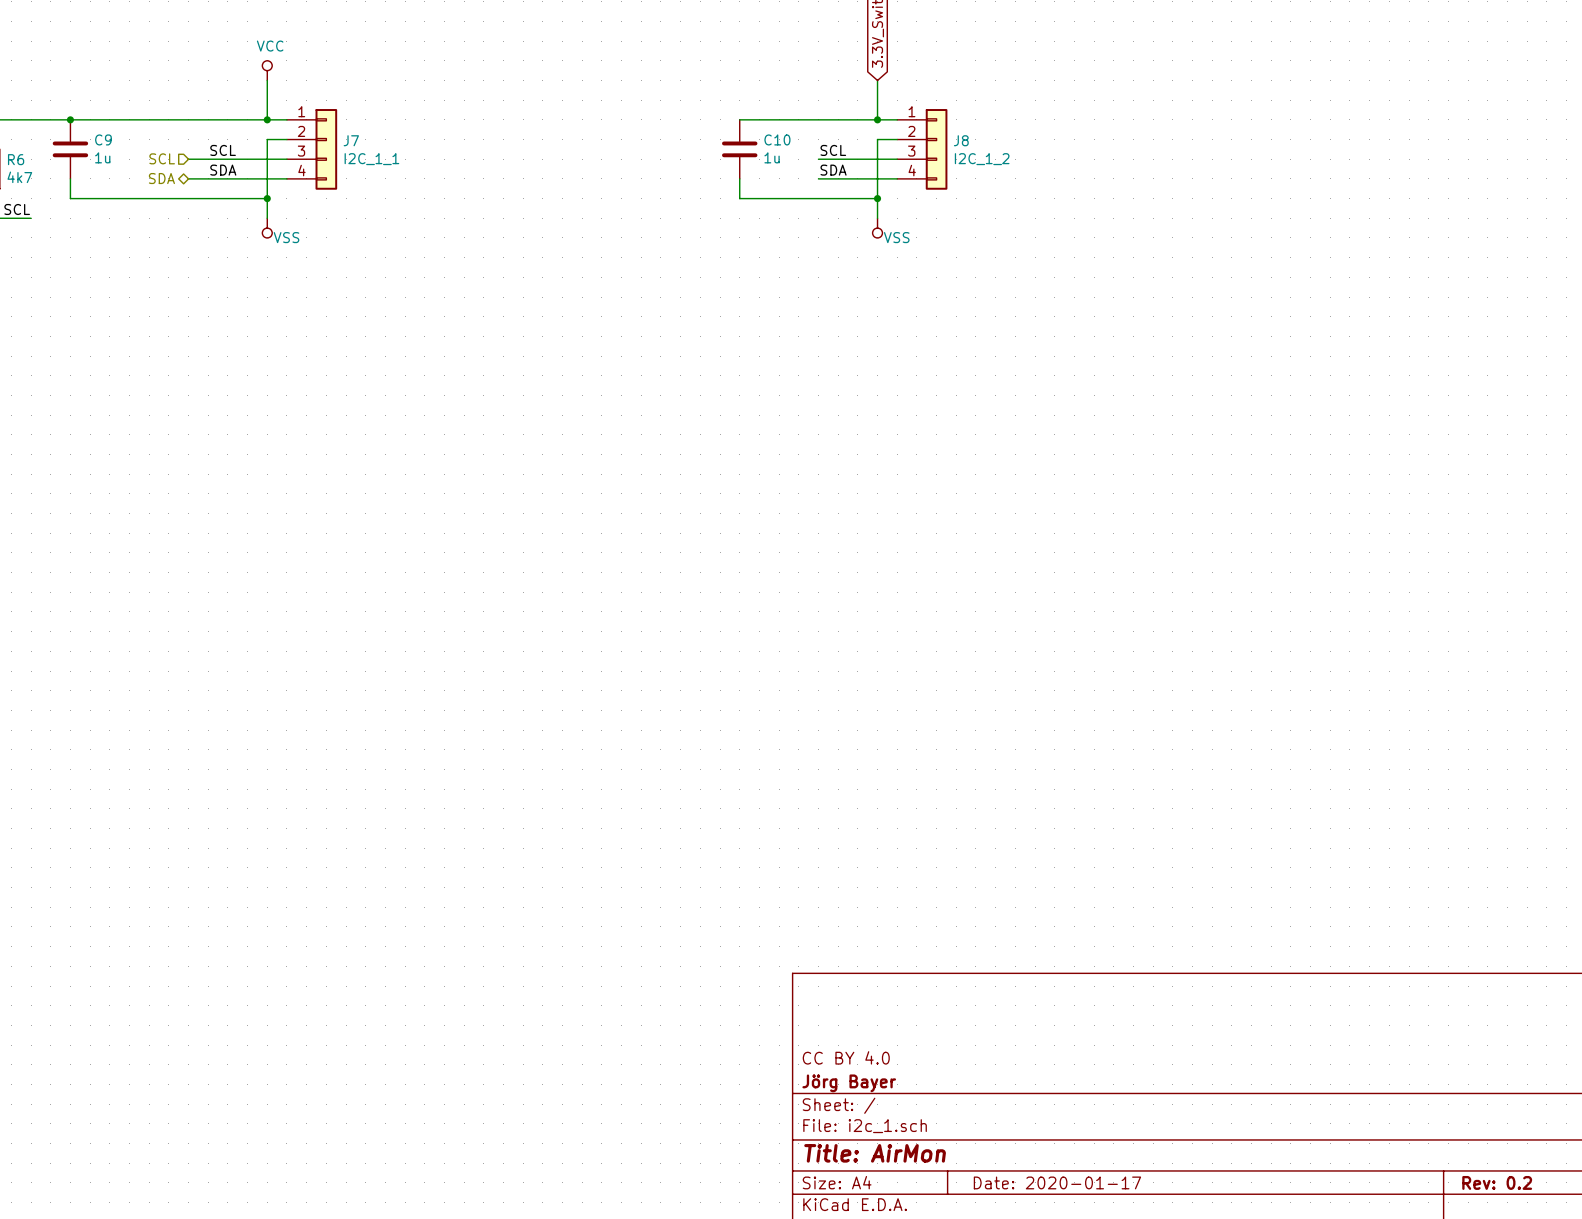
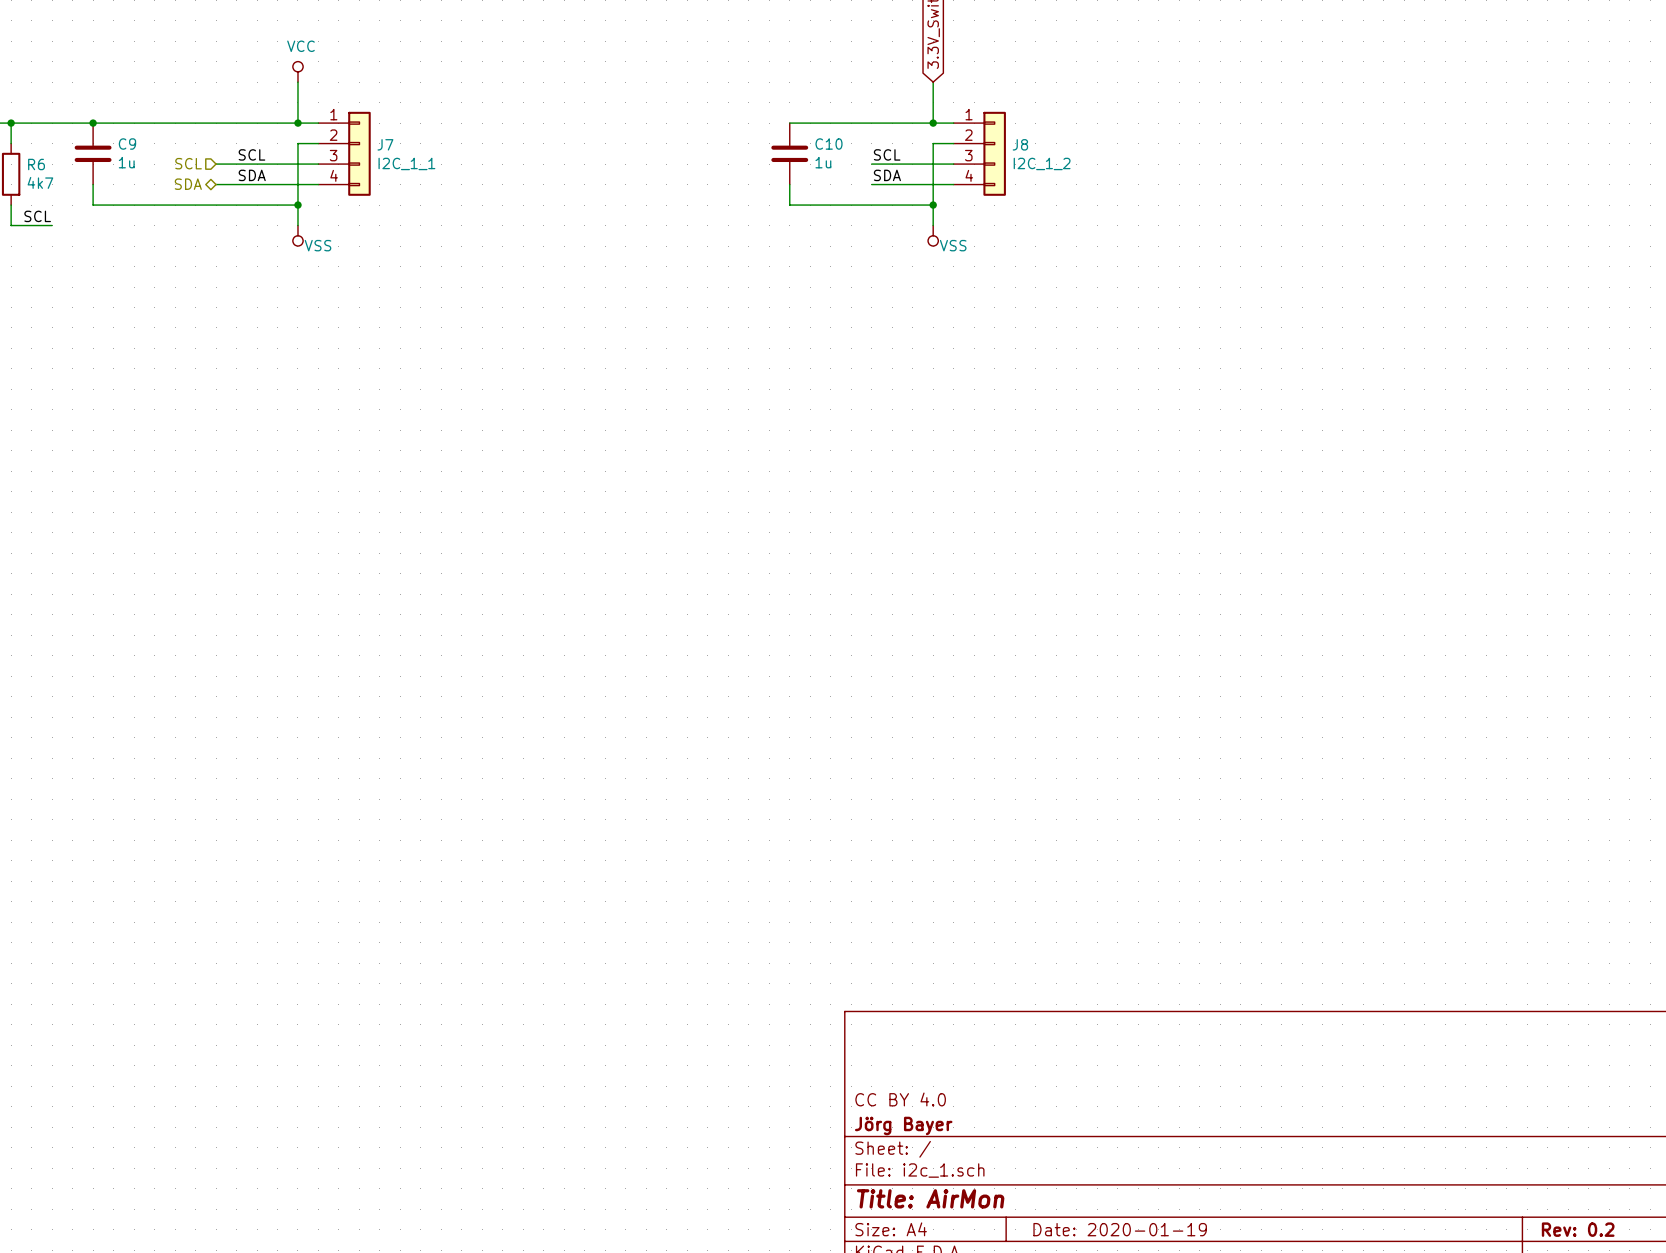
title block: Date: 2020-01-17 (1057, 1182) -> Date: 2020-01-19 (1120, 1229)

